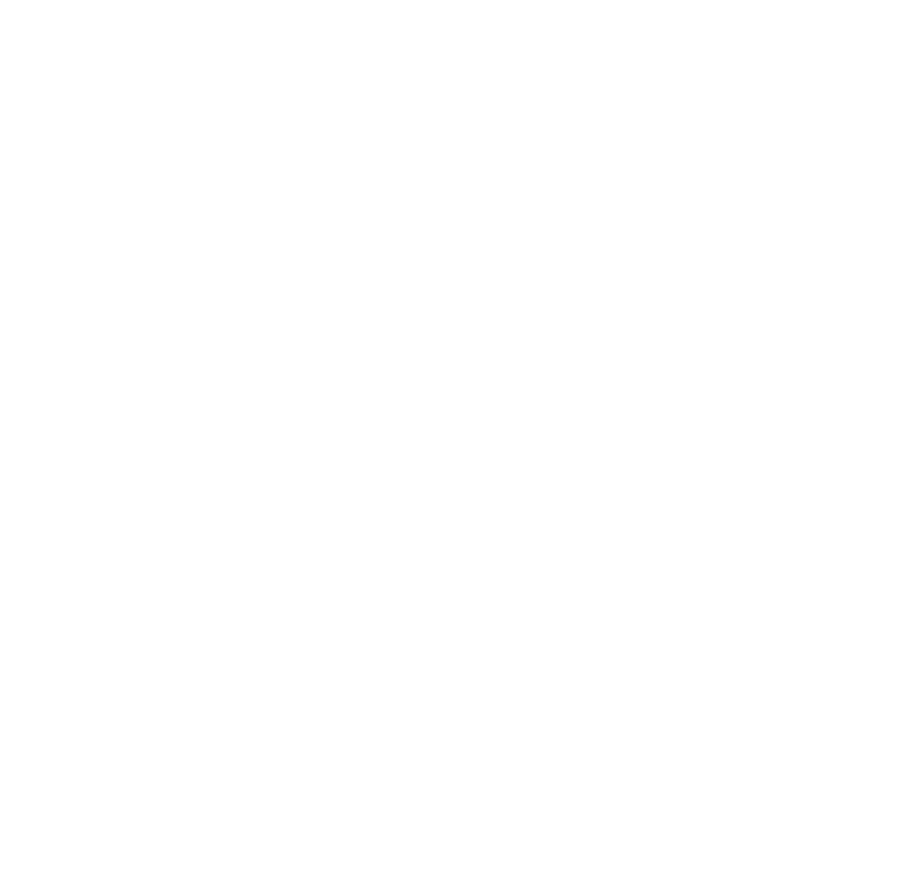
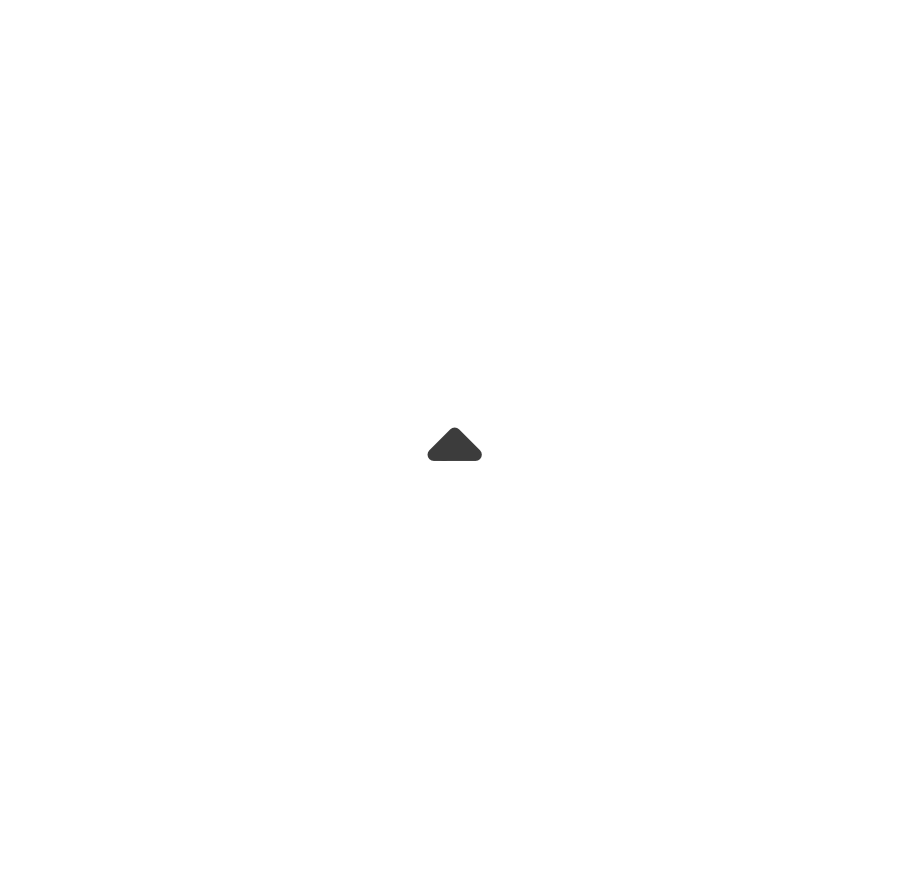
drawing: none -> [427, 427, 482, 461]

